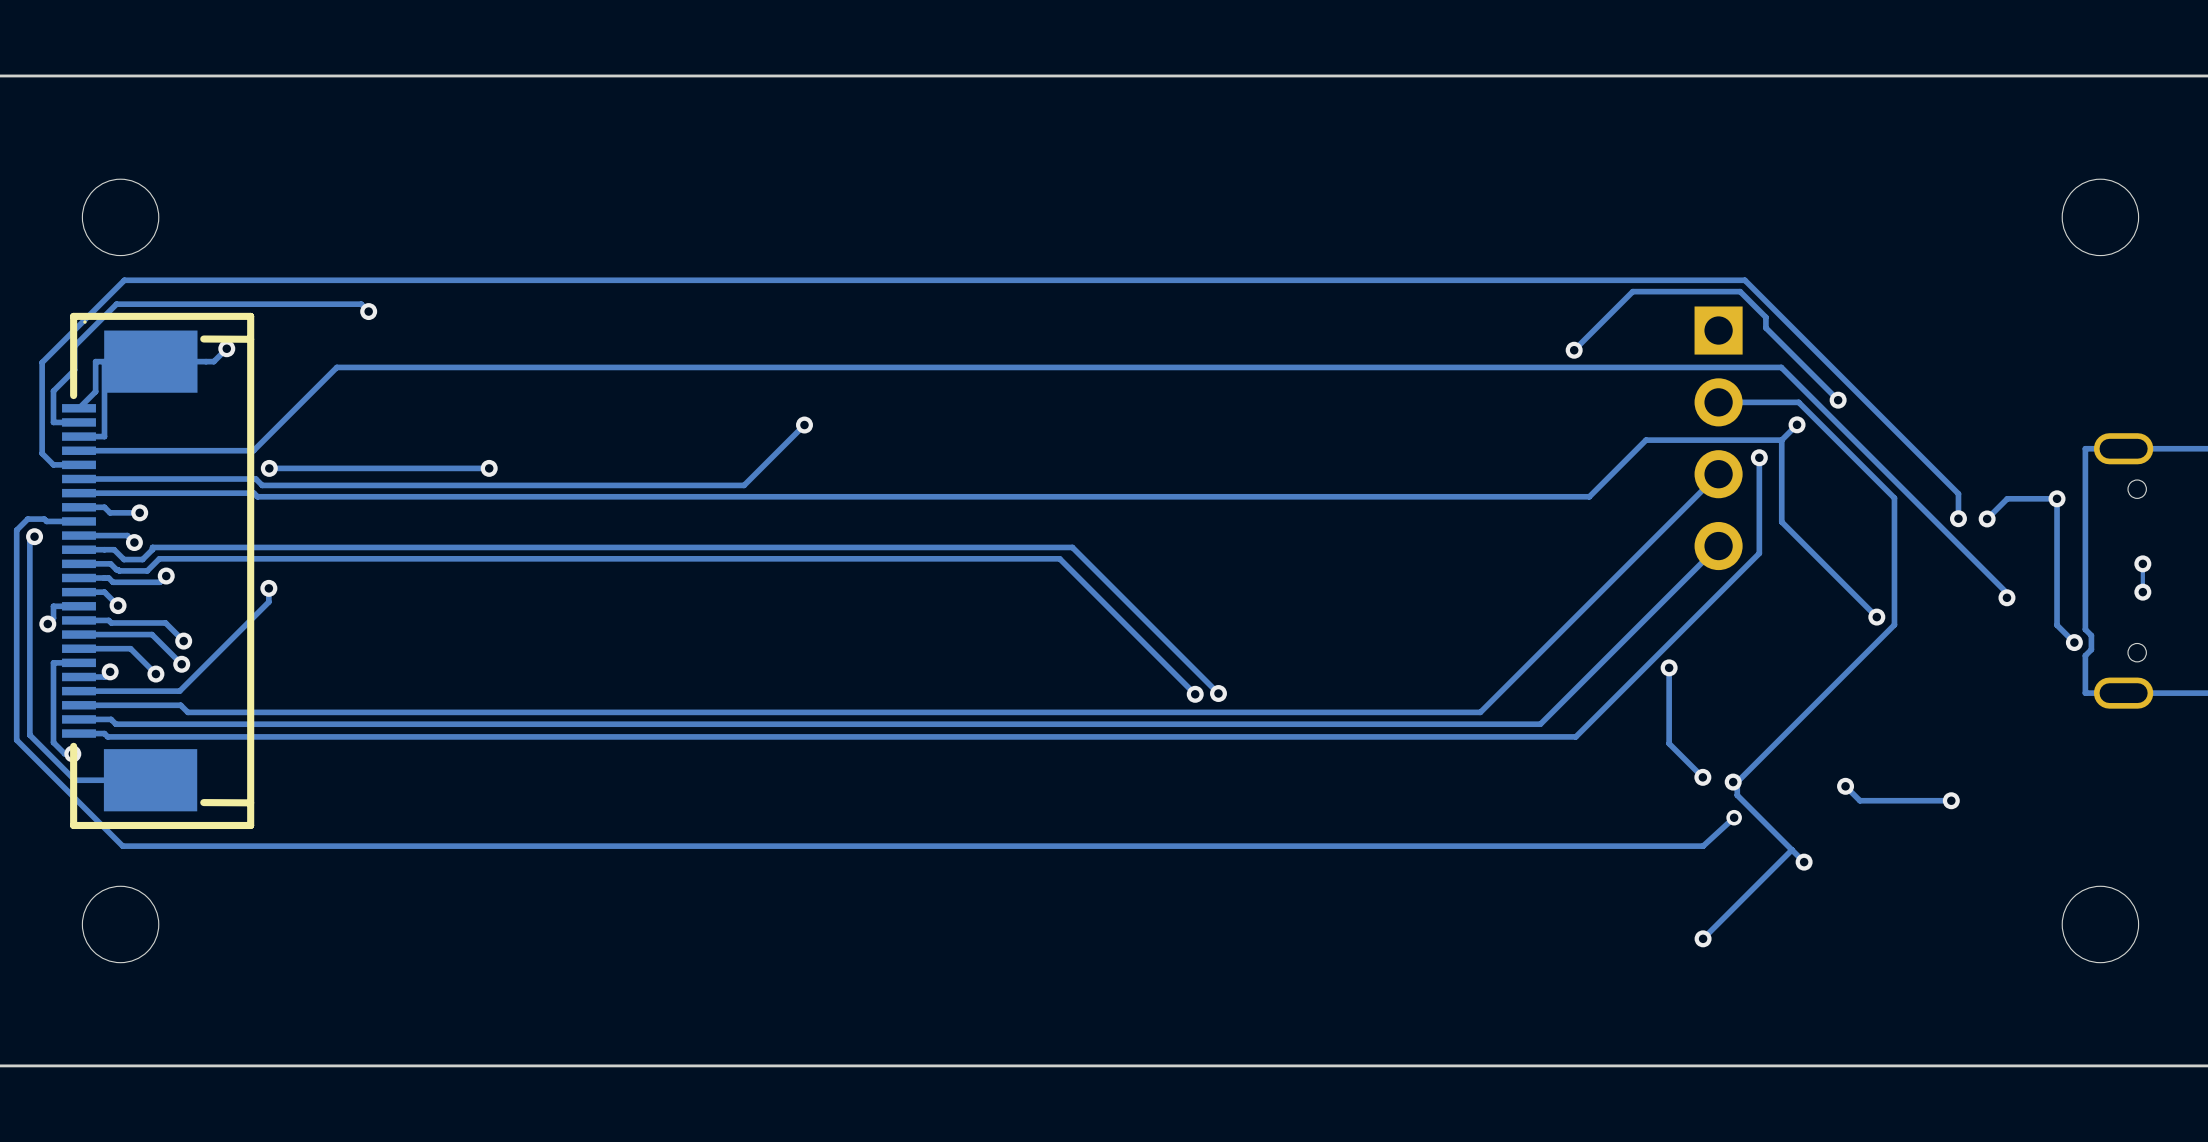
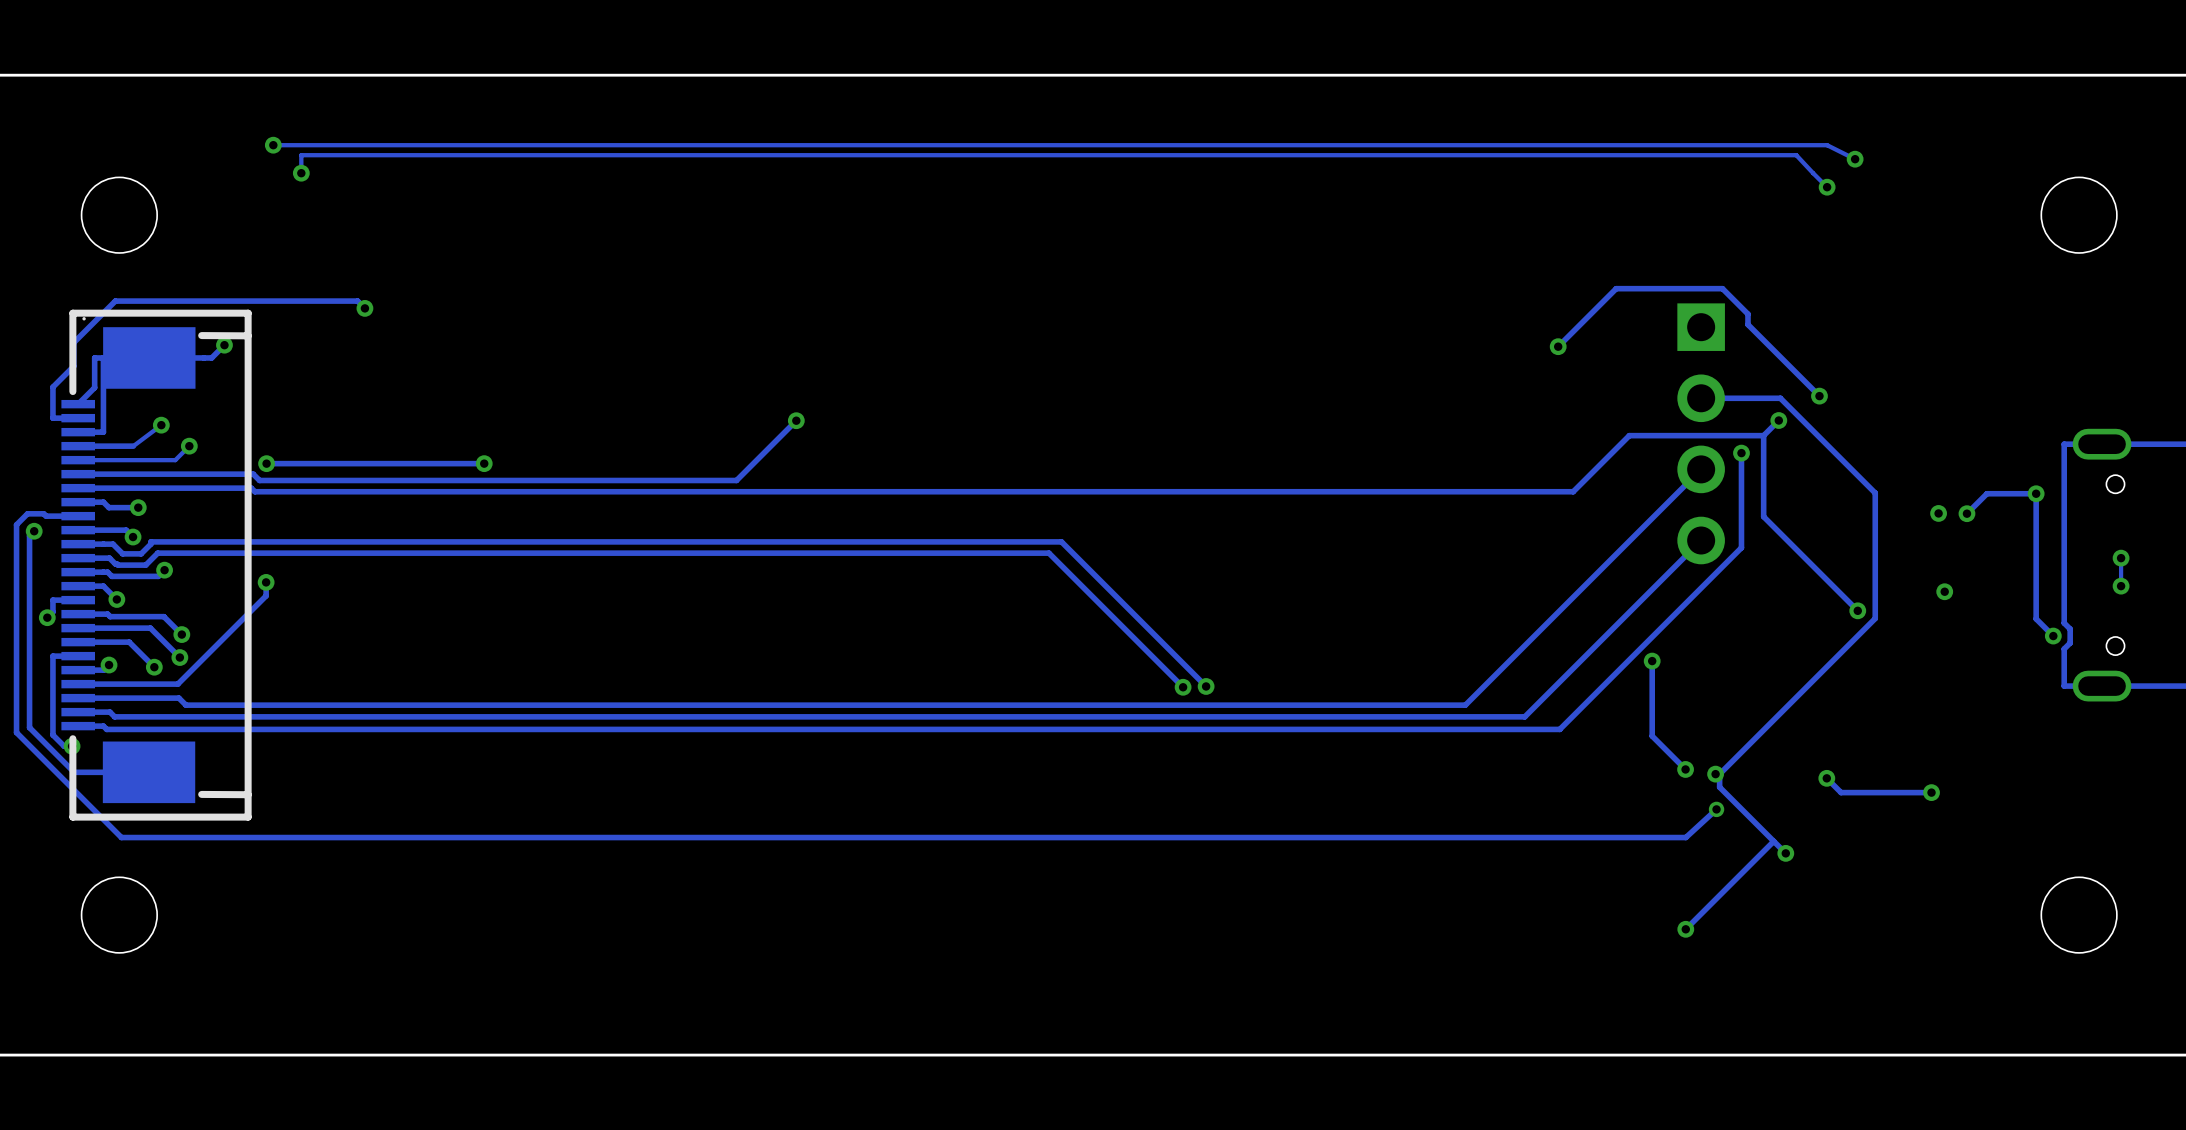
track: none -> (273, 145) (1827, 145) (1855, 159)
via: none -> (273, 145)
via: none -> (1855, 159)
track: none -> (301, 173) (301, 155) (1796, 155) (1827, 187)
via: none -> (301, 173)
via: none -> (1827, 187)
via: none -> (161, 425)
track: (134, 450) (253, 450) (336, 367) (1781, 367) (2006, 593) (2006, 597) -> (133, 446) (161, 425)
via: none -> (189, 446)
track: (79, 464) (53, 464) (42, 453) (42, 362) (124, 280) (1744, 280) (1958, 493) (1958, 518) -> (78, 460) (175, 460) (189, 446)
via position: (2006, 597) -> (1944, 591)

